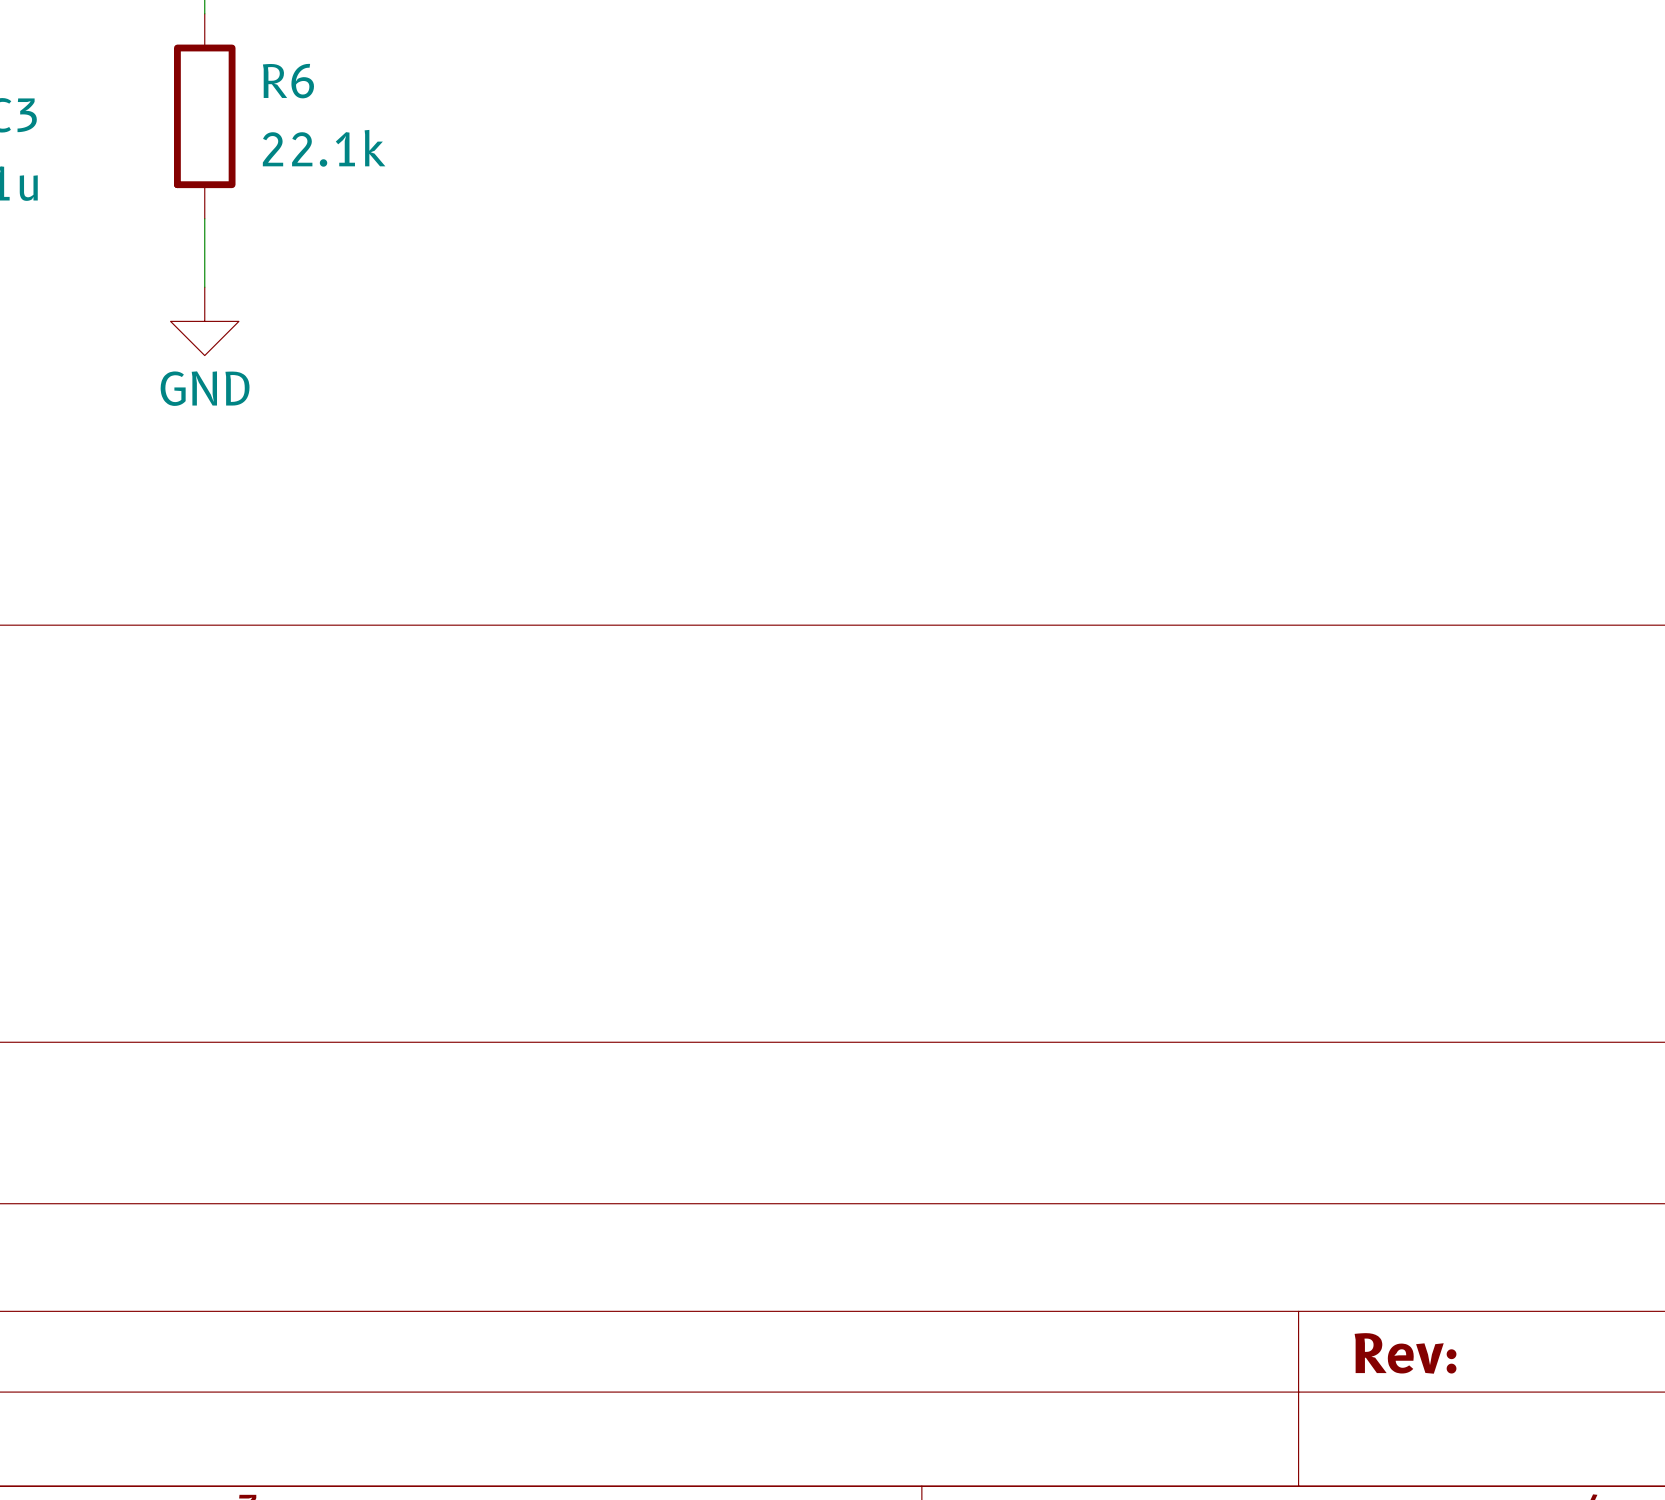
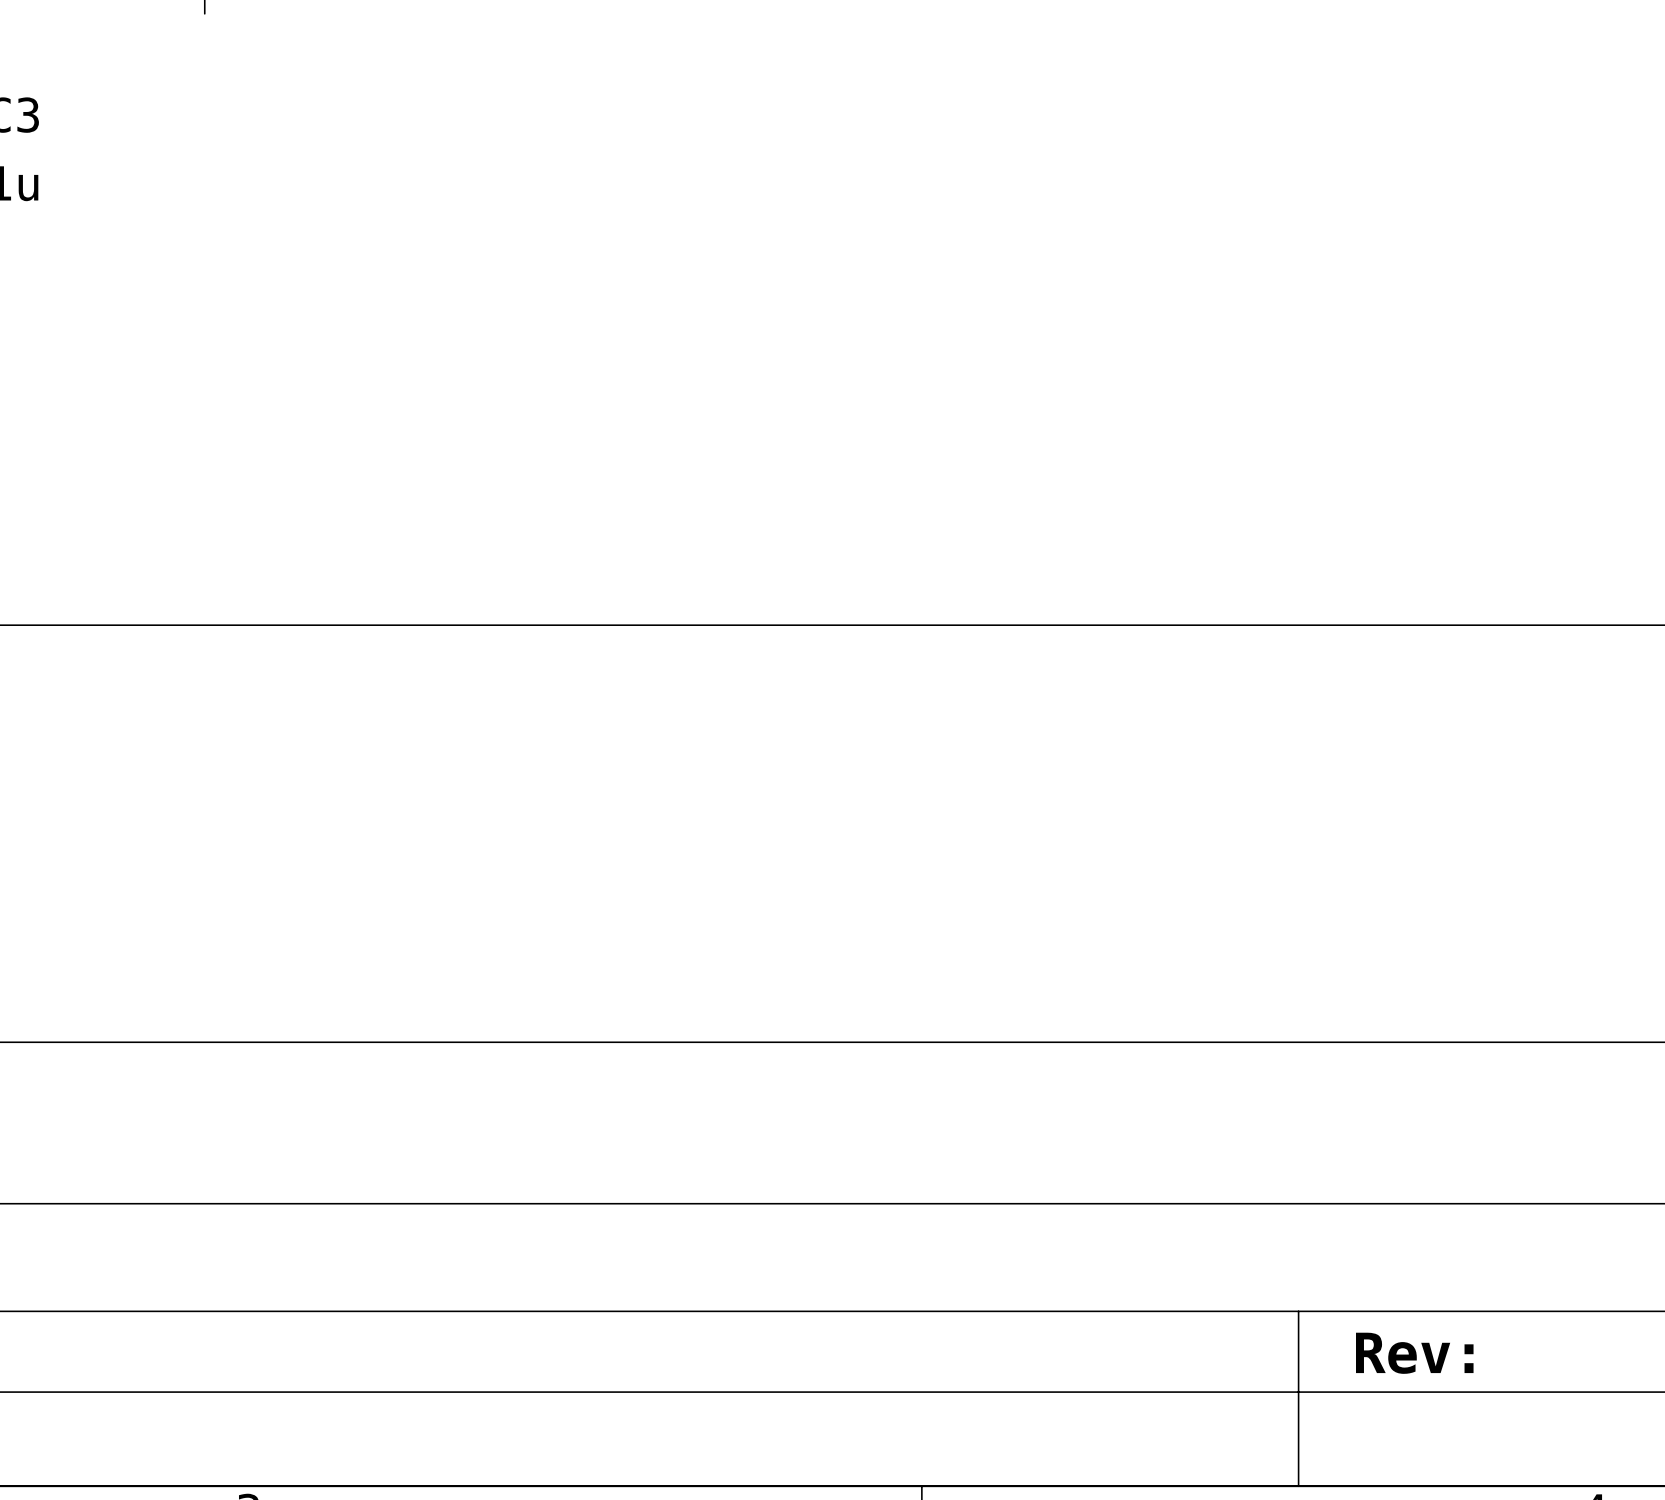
R6: 22.1k (204, 116) -> none
wire: (204, 218) (204, 287) -> none
power symbol: GND (204, 321) -> none

